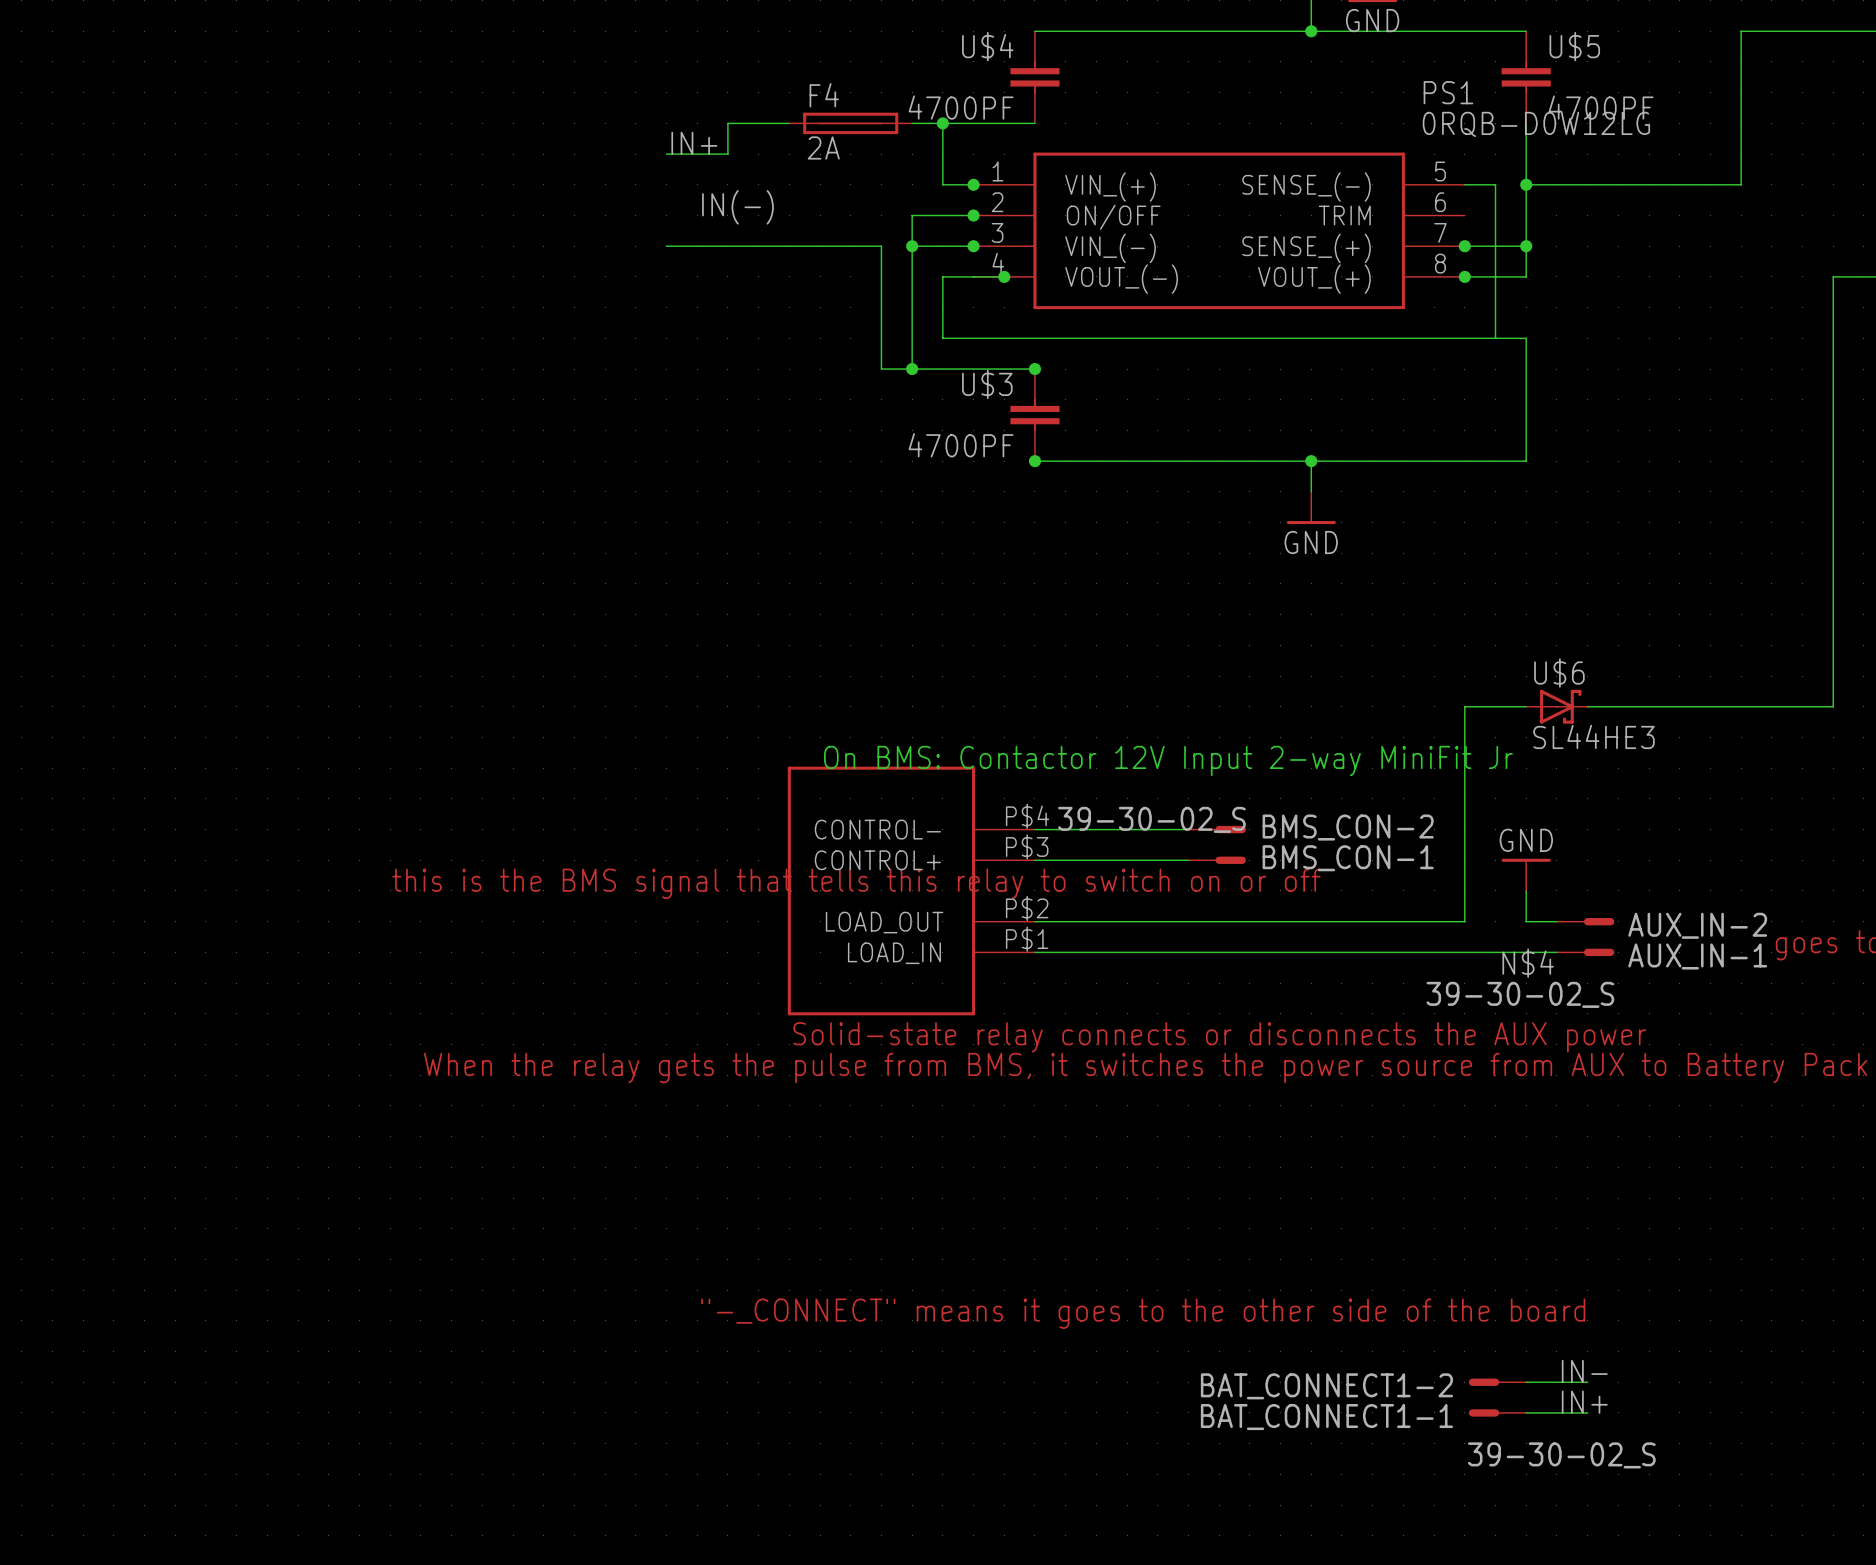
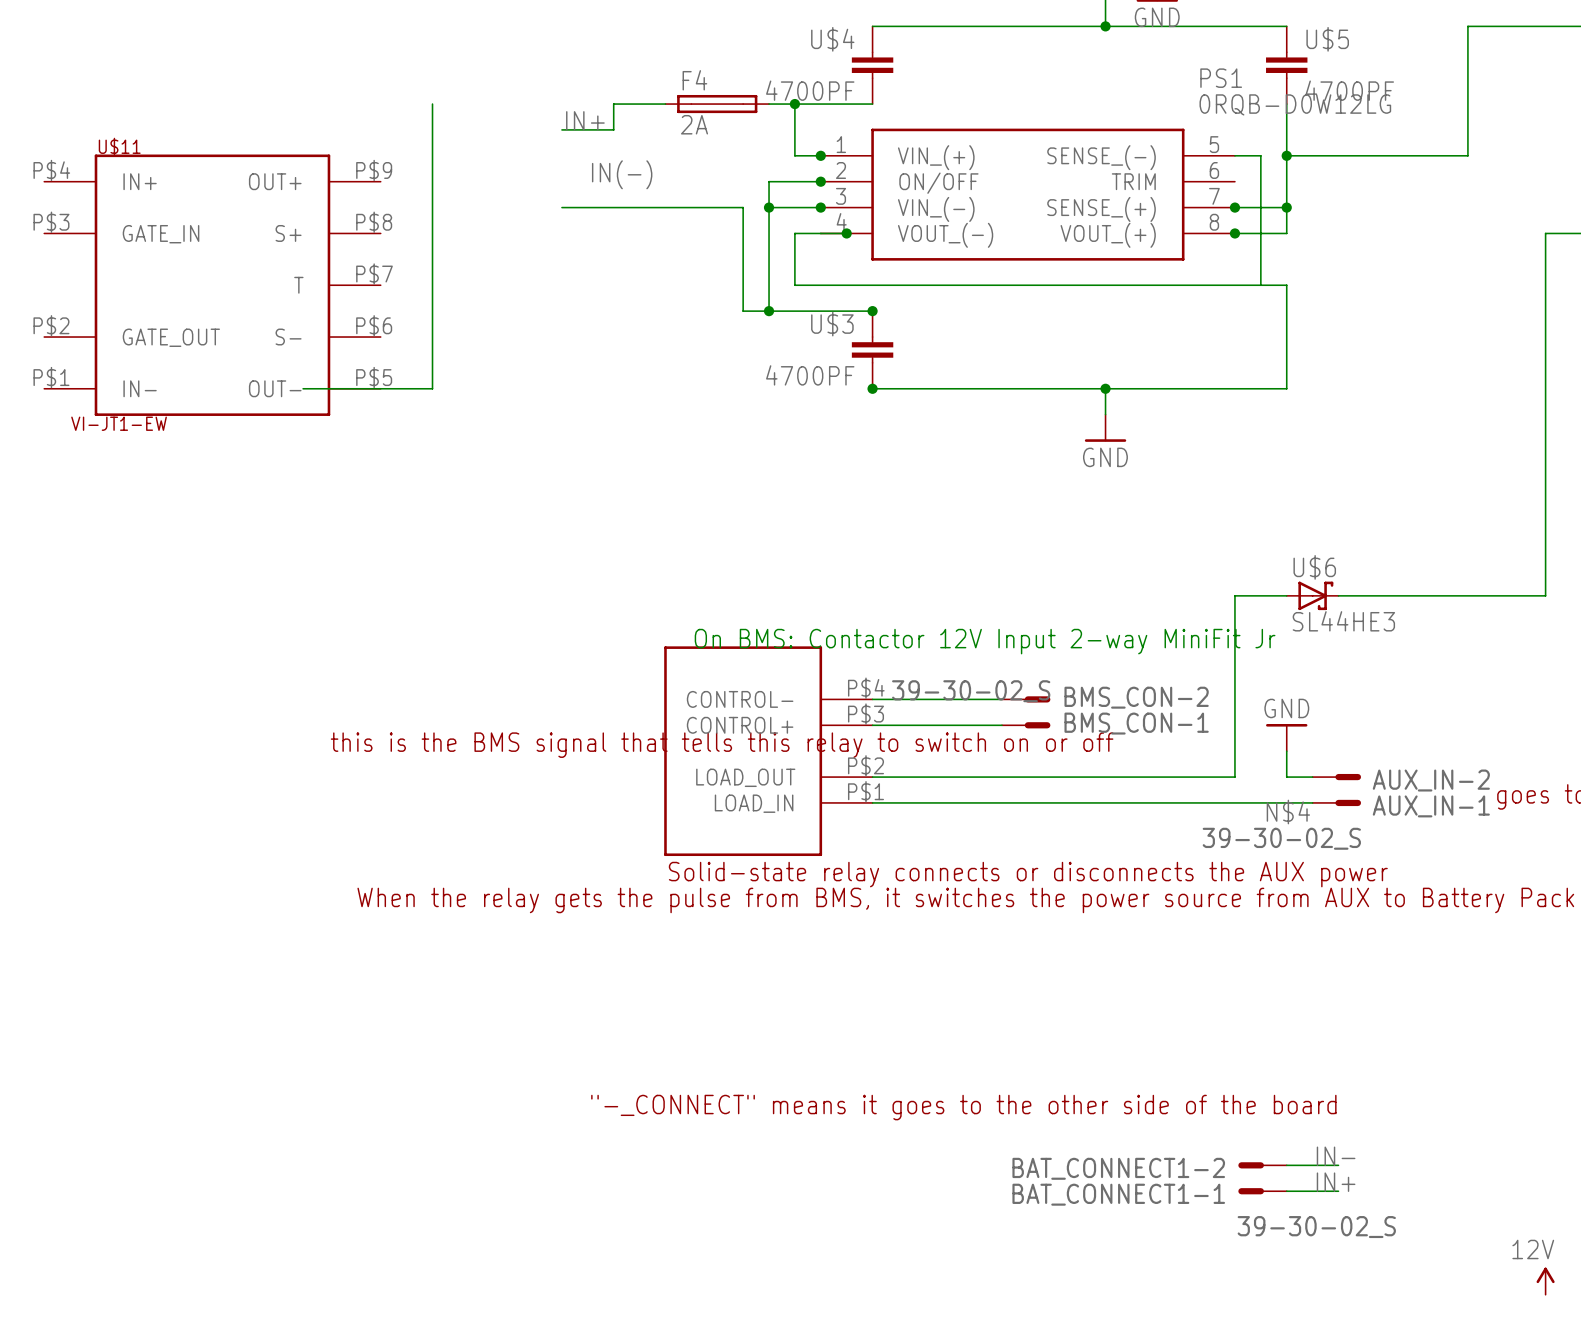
wire: none -> (432, 104) (432, 388) (303, 388)
U$11: none -> VI-JT1-EW (212, 285)
power symbol: none -> 12V (1545, 1281)

